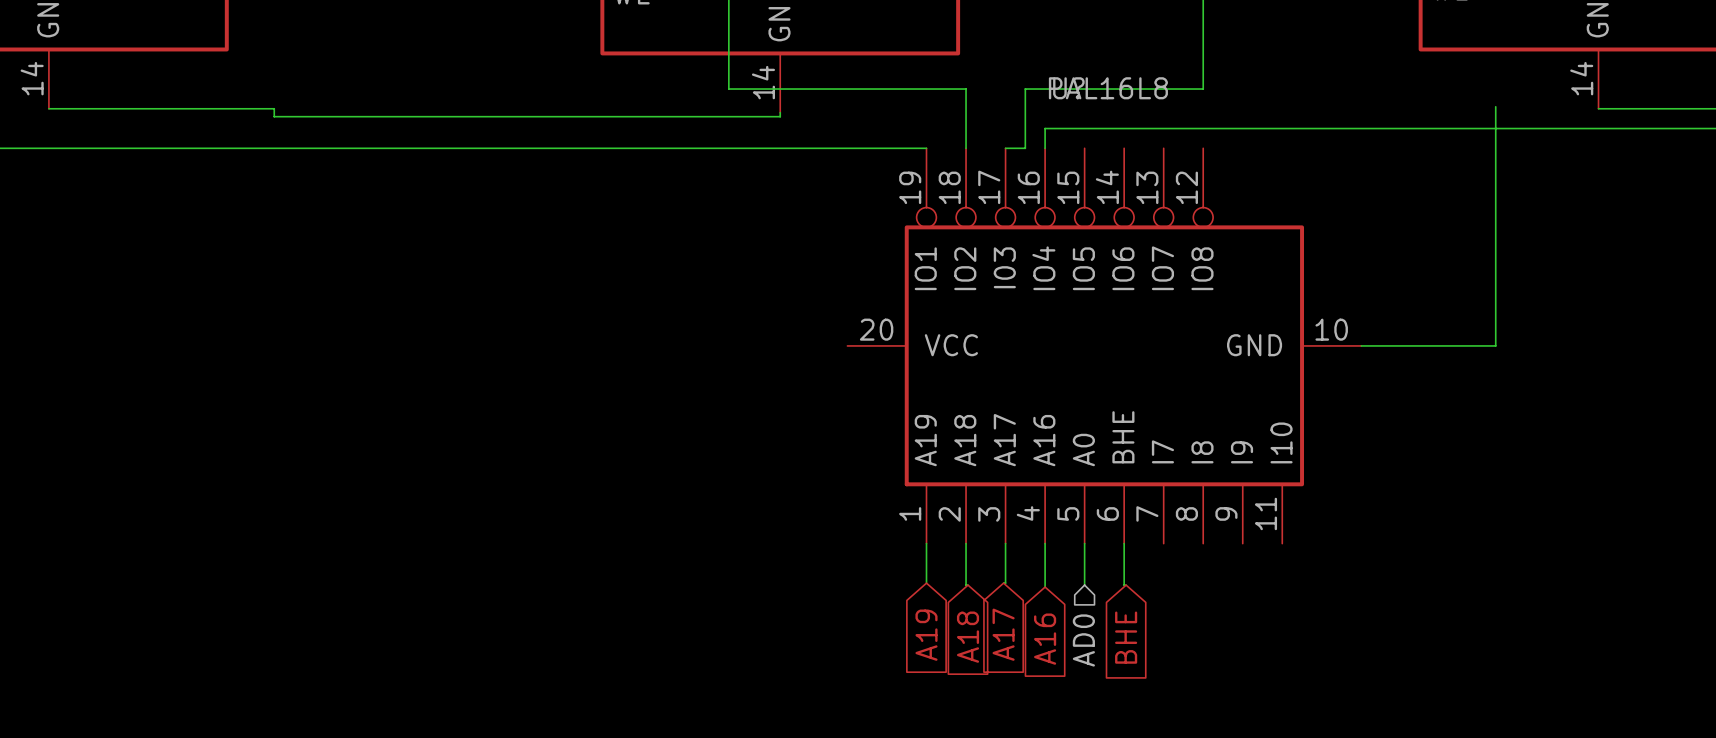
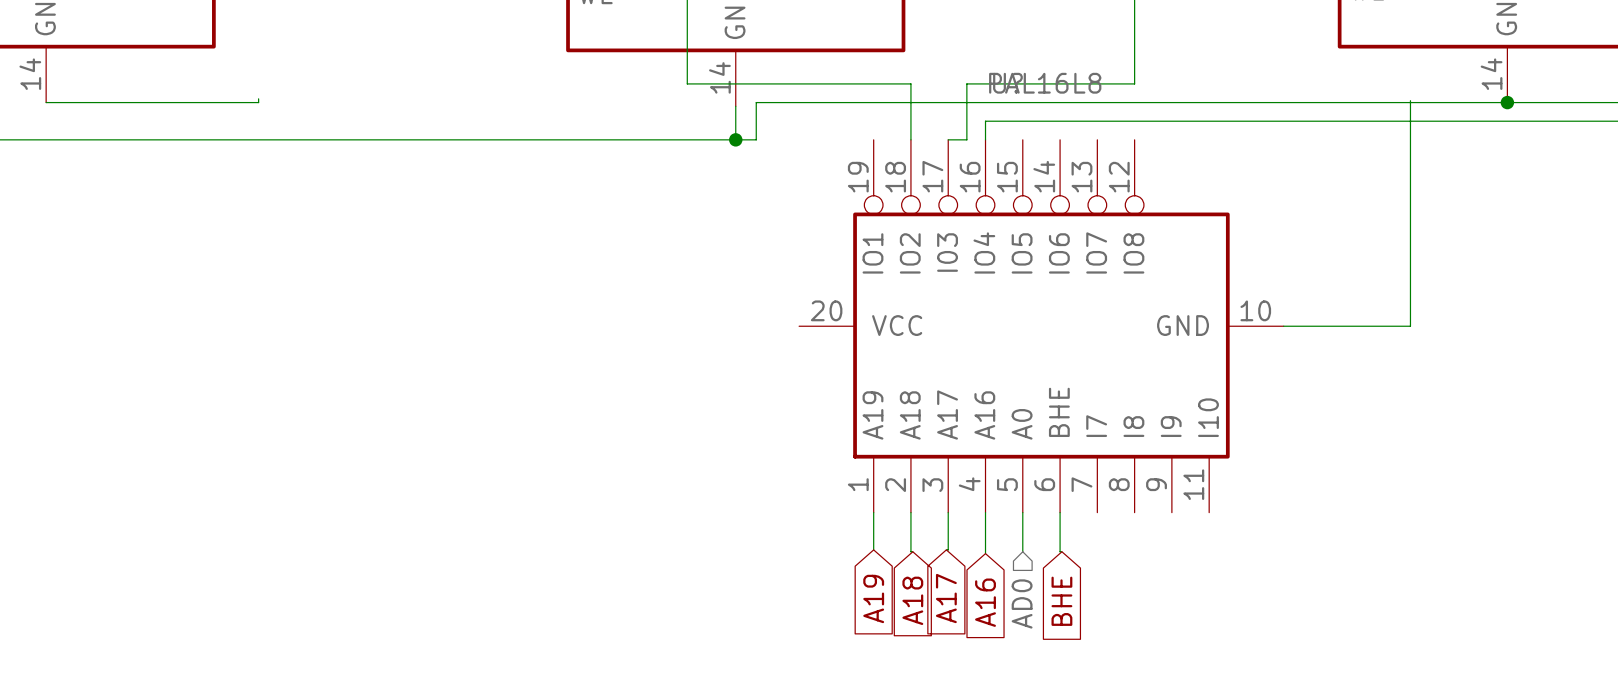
wire: (274, 108) (274, 116) (780, 116) -> (258, 102) (258, 98)
junction: none -> (1507, 102)
wire: none -> (735, 110) (735, 139)
junction: none -> (735, 139)
wire: (801, 148) (926, 148) -> (756, 139) (756, 102) (1507, 102)

